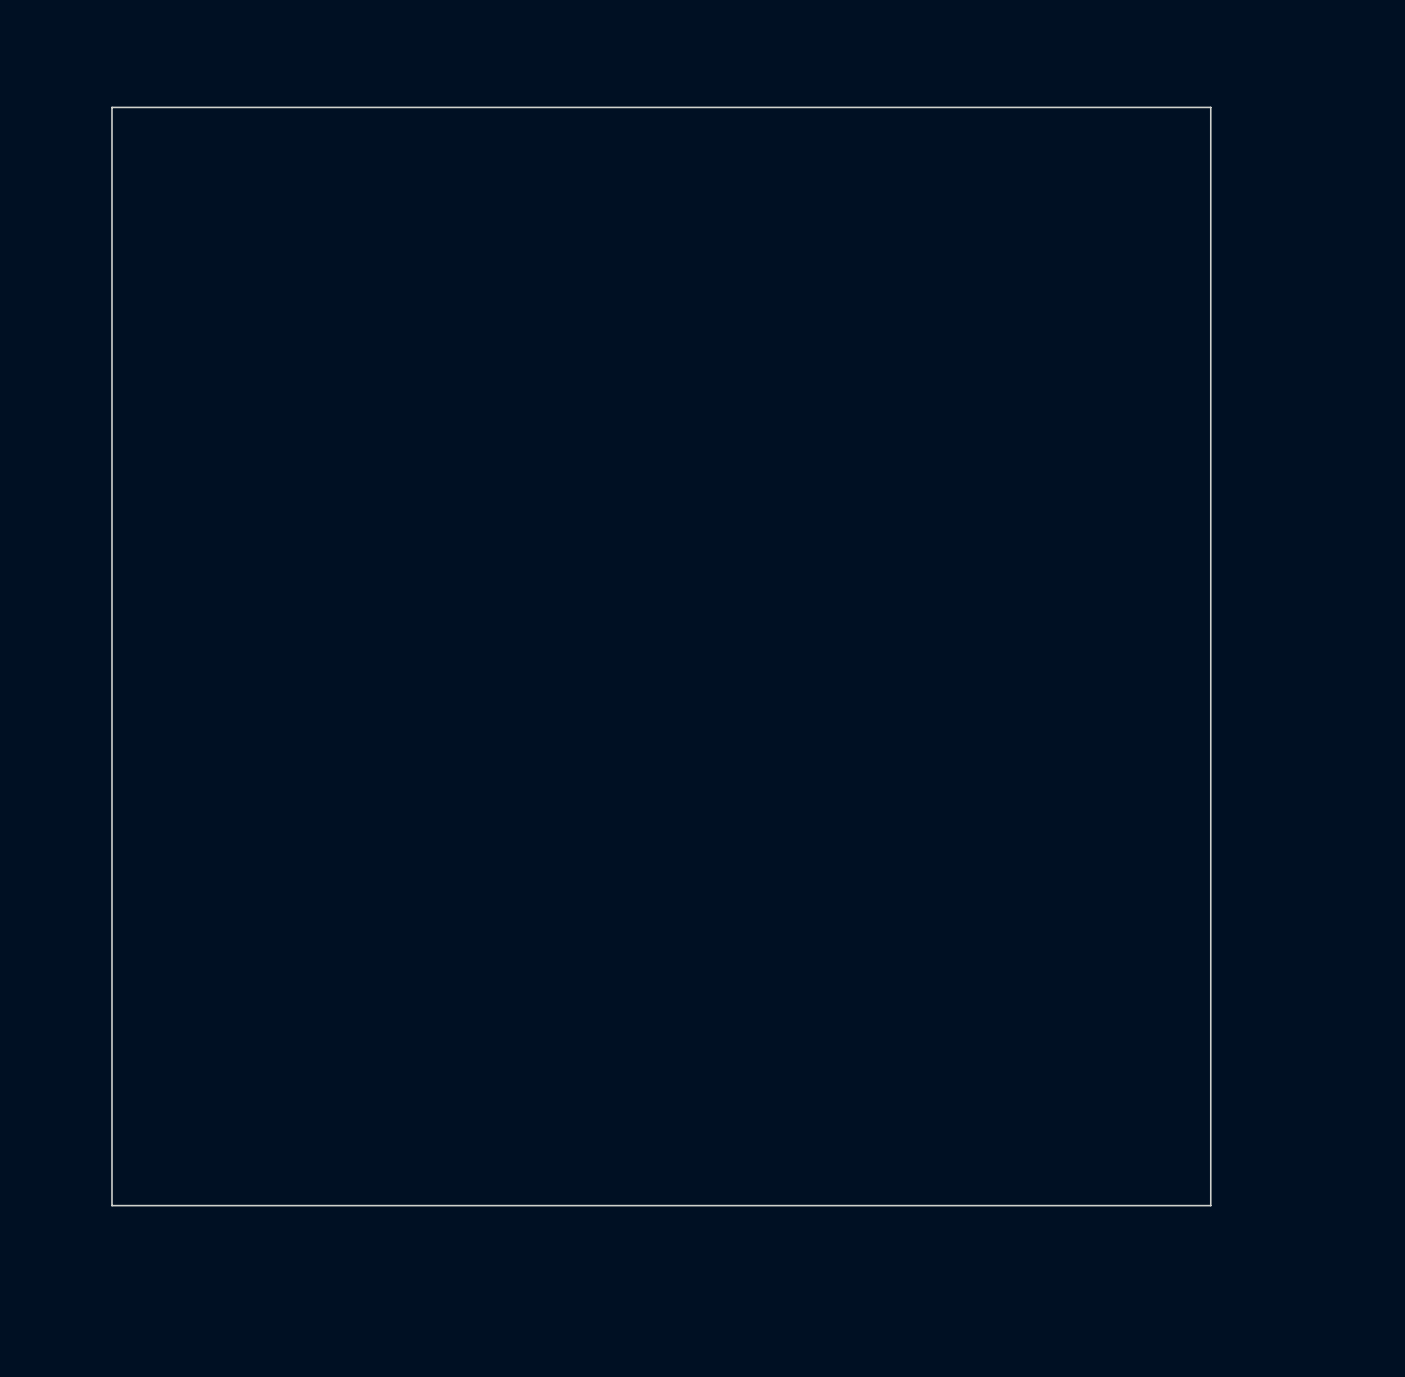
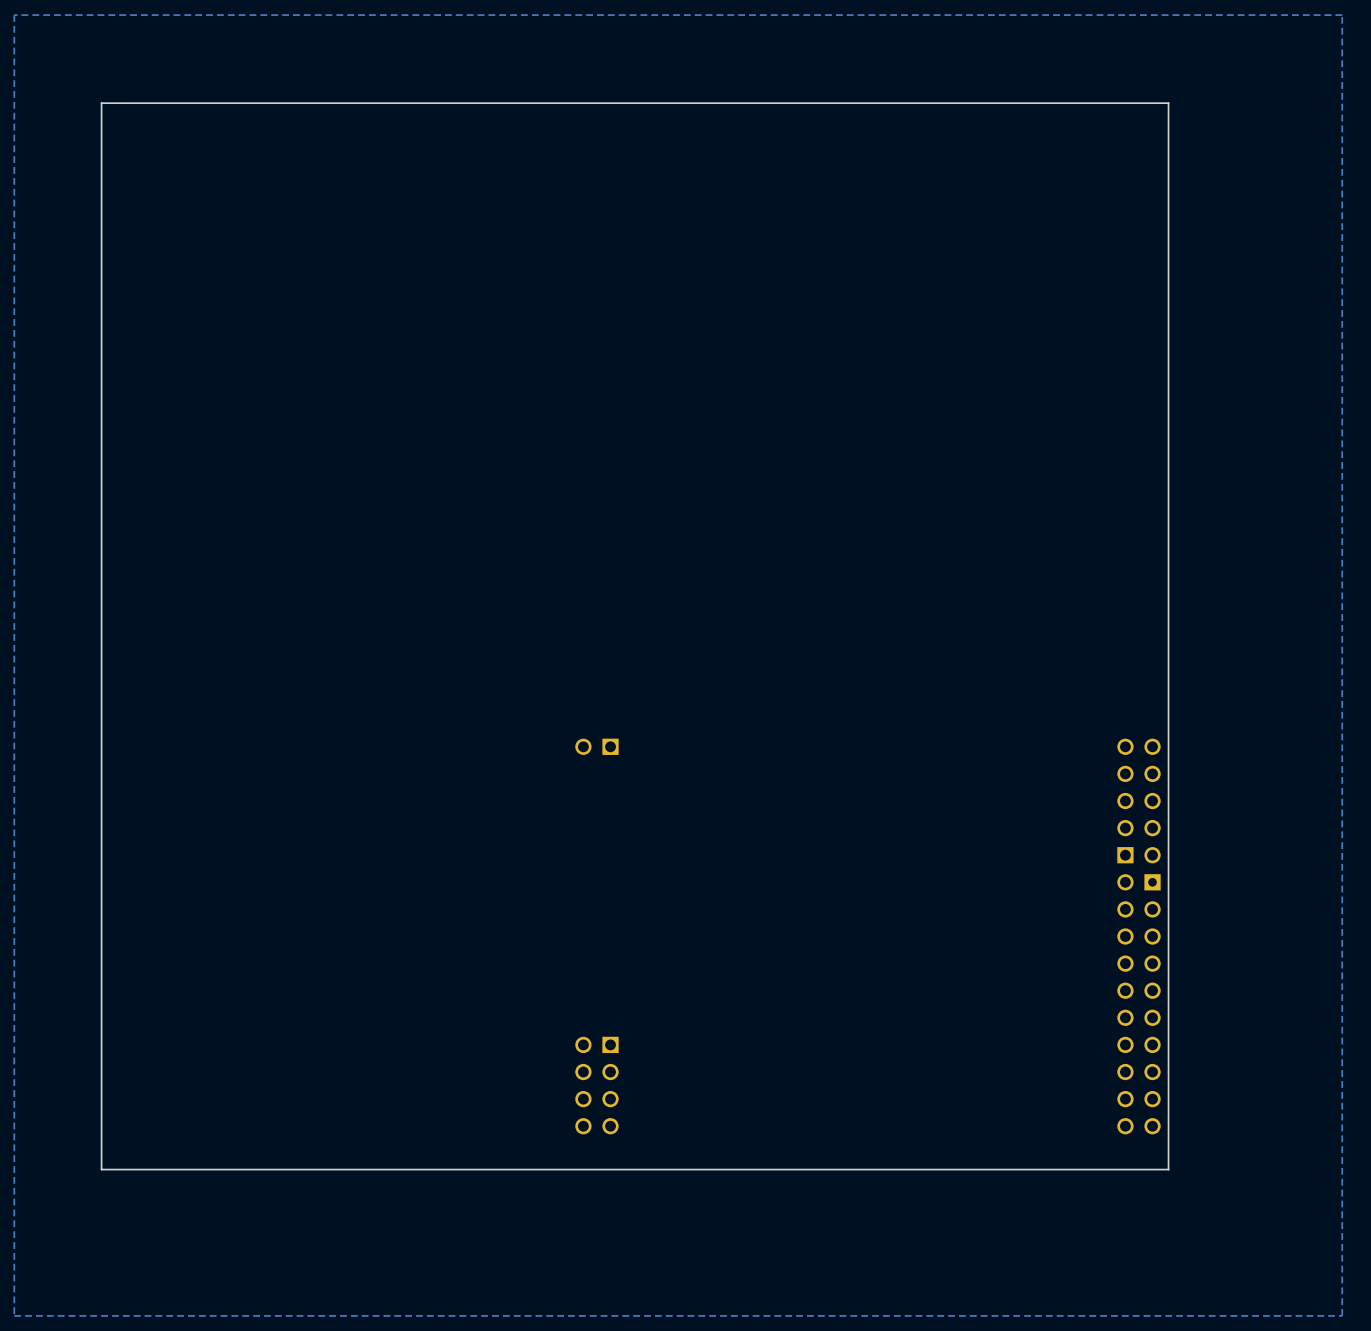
zone outline: none -> (1342, 15) (1342, 1315) (14, 1315) (14, 15) (1342, 15)
part: none -> (596, 746)
part: none -> (1138, 801)
part: none -> (1138, 1004)
part: none -> (596, 1085)

